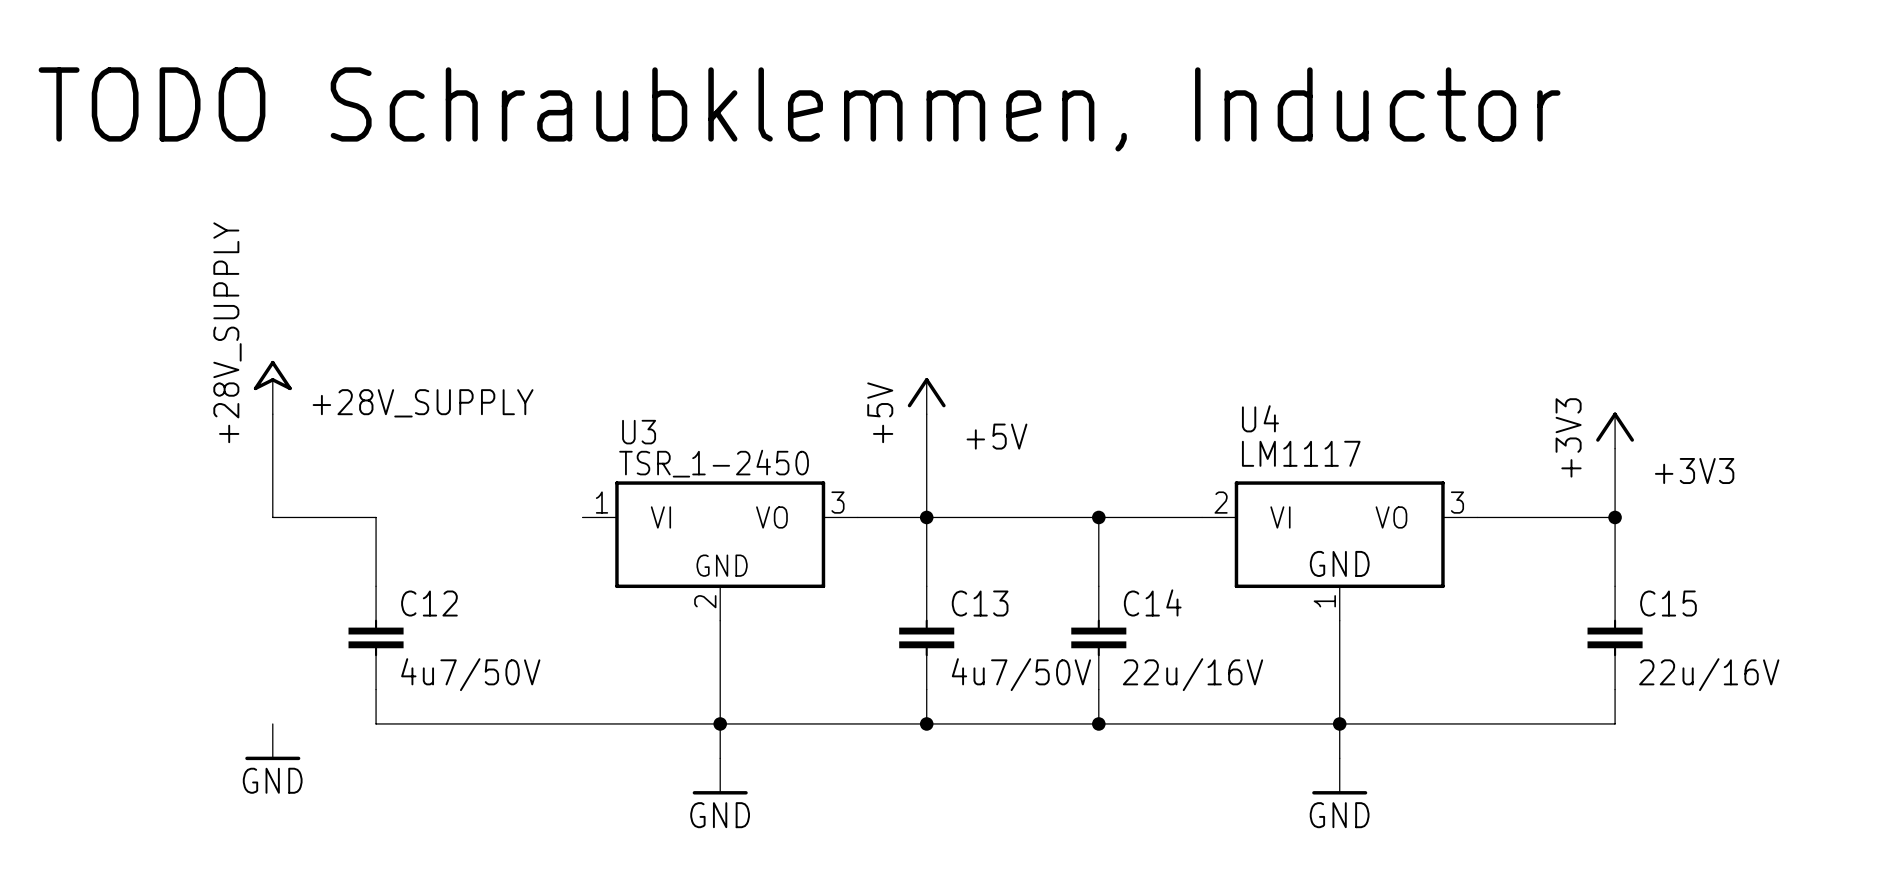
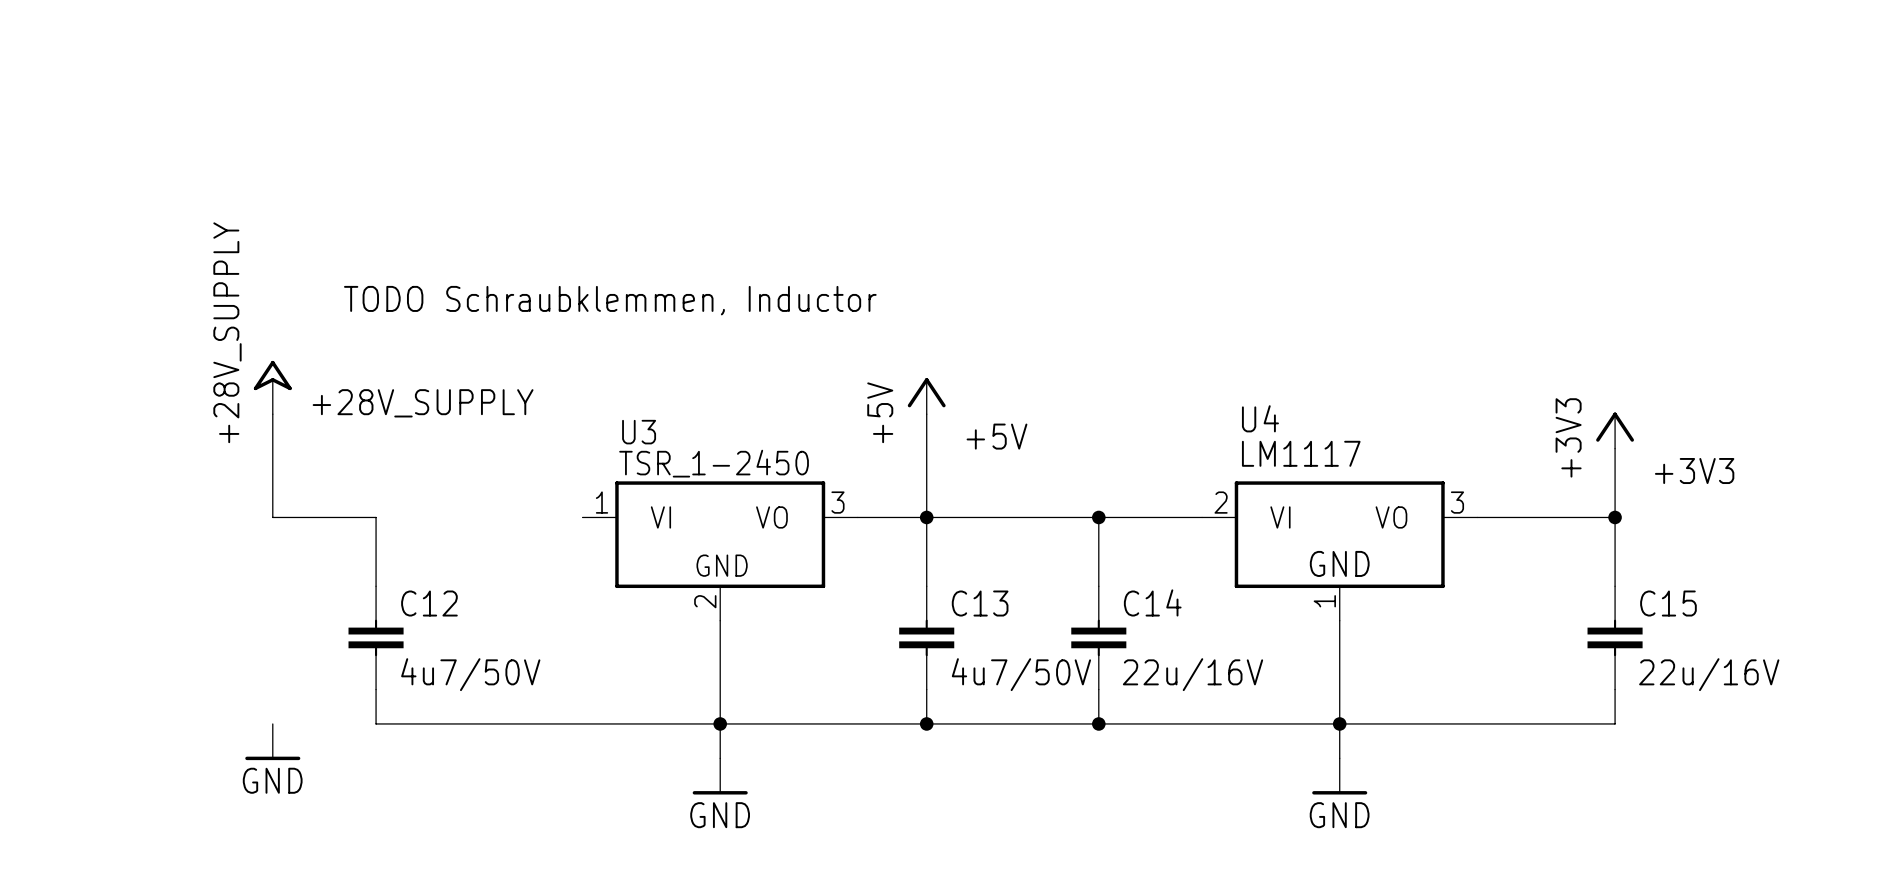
text: TODO Schraubklemmen, Inductor (799, 109) -> none
text: none -> TODO Schraubklemmen, Inductor (610, 300)

